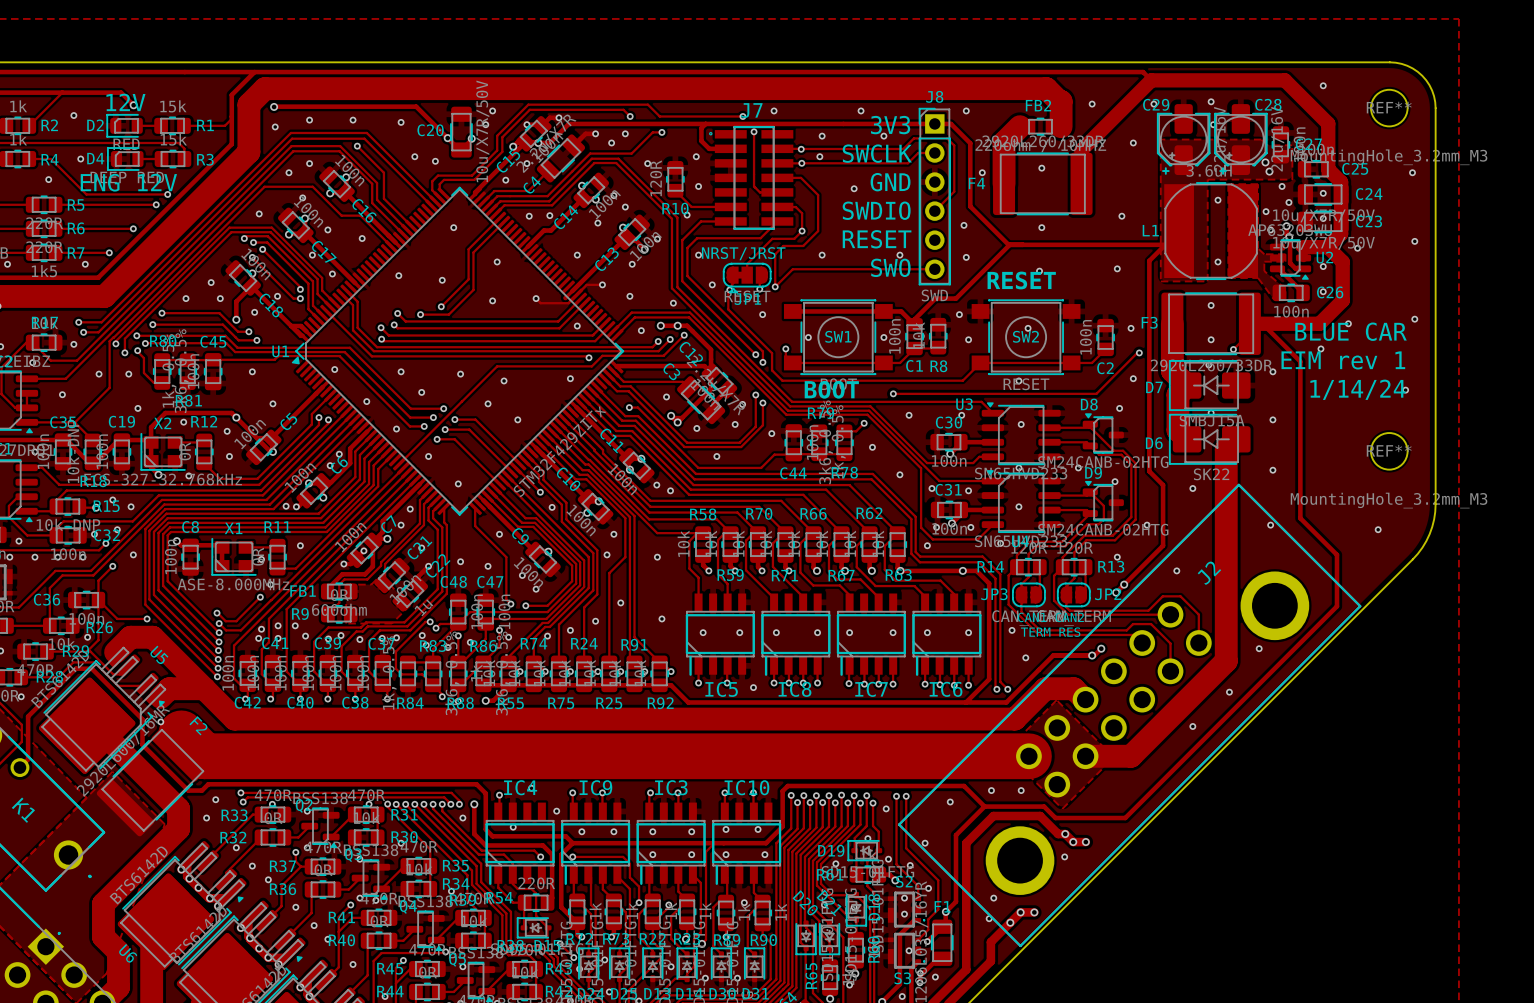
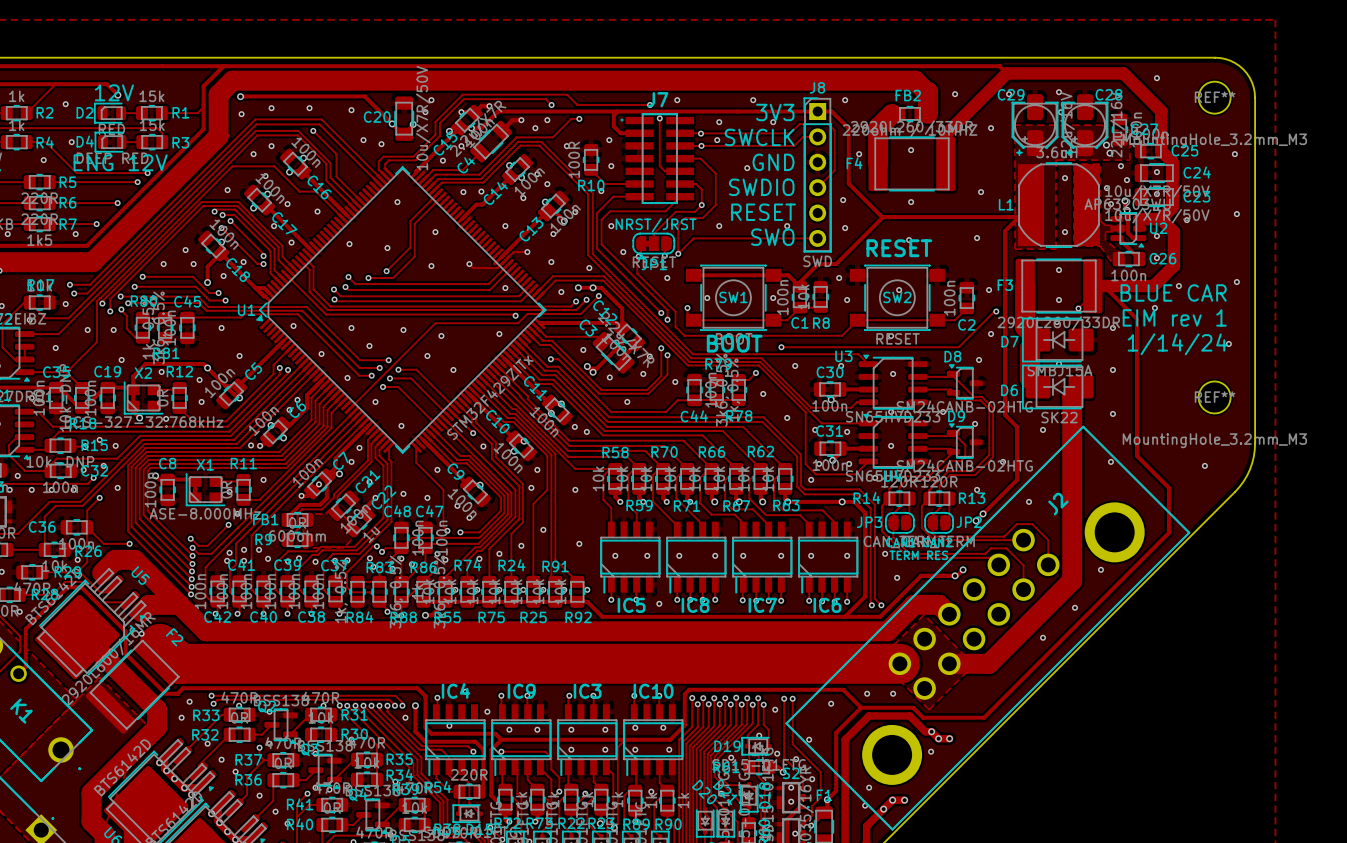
R10 value: 120R (656, 178) -> 100R (574, 159)

